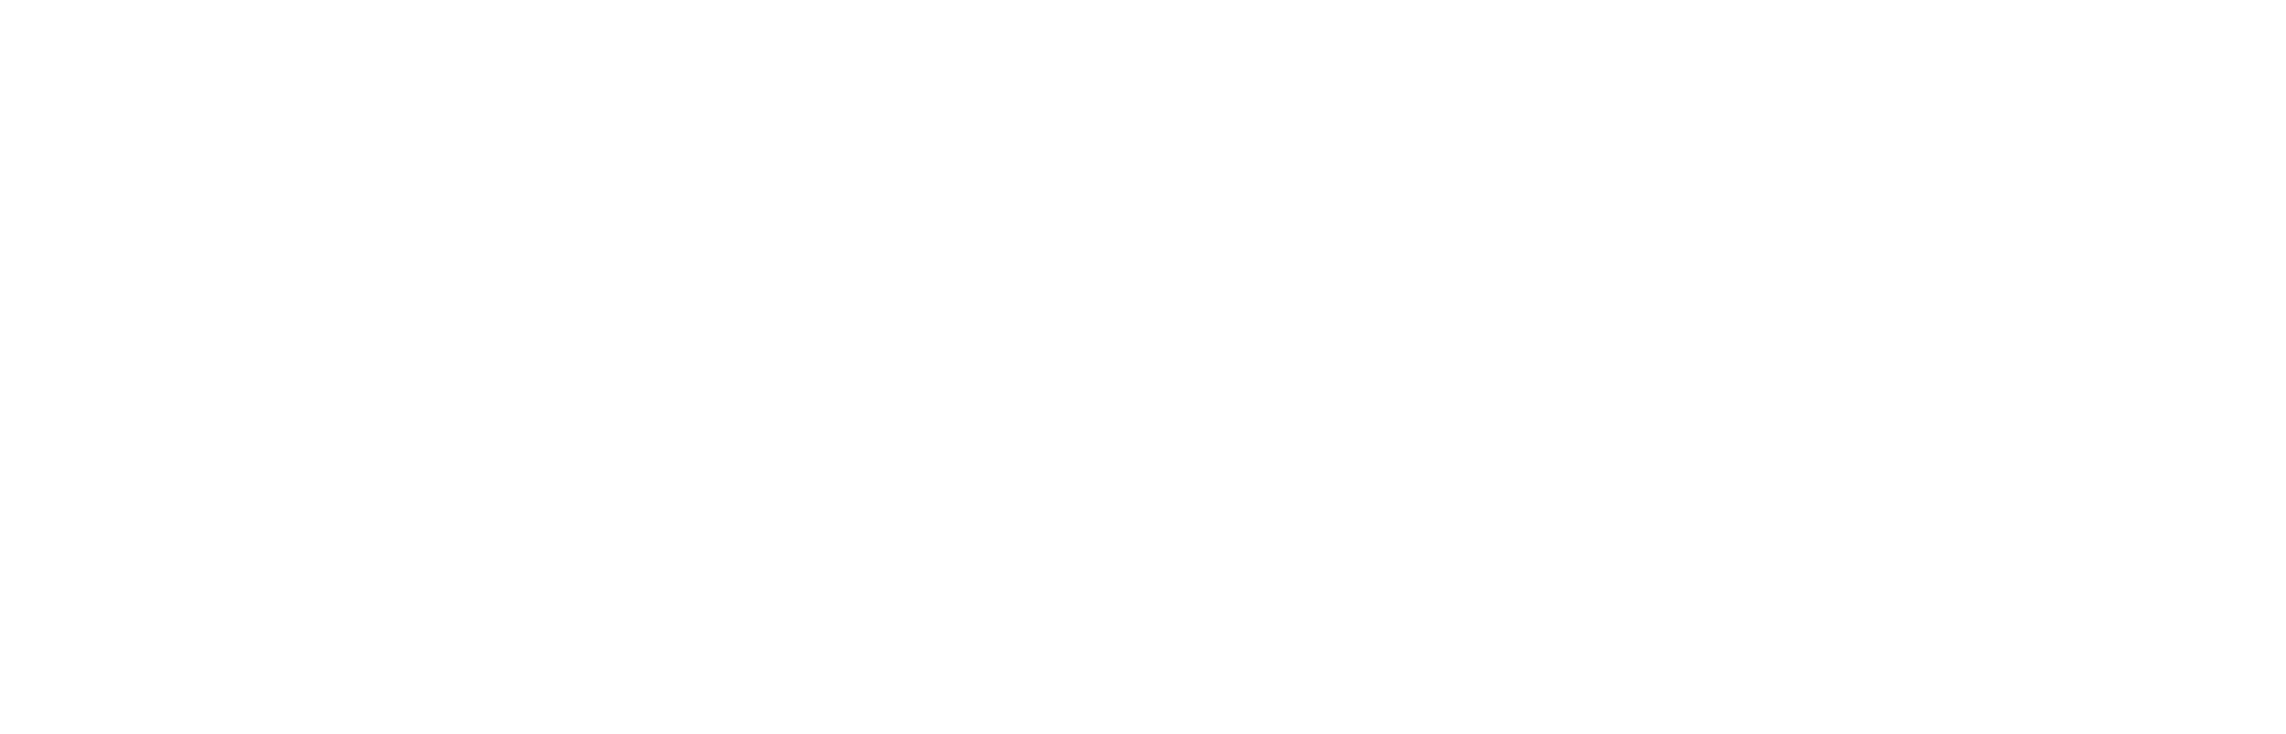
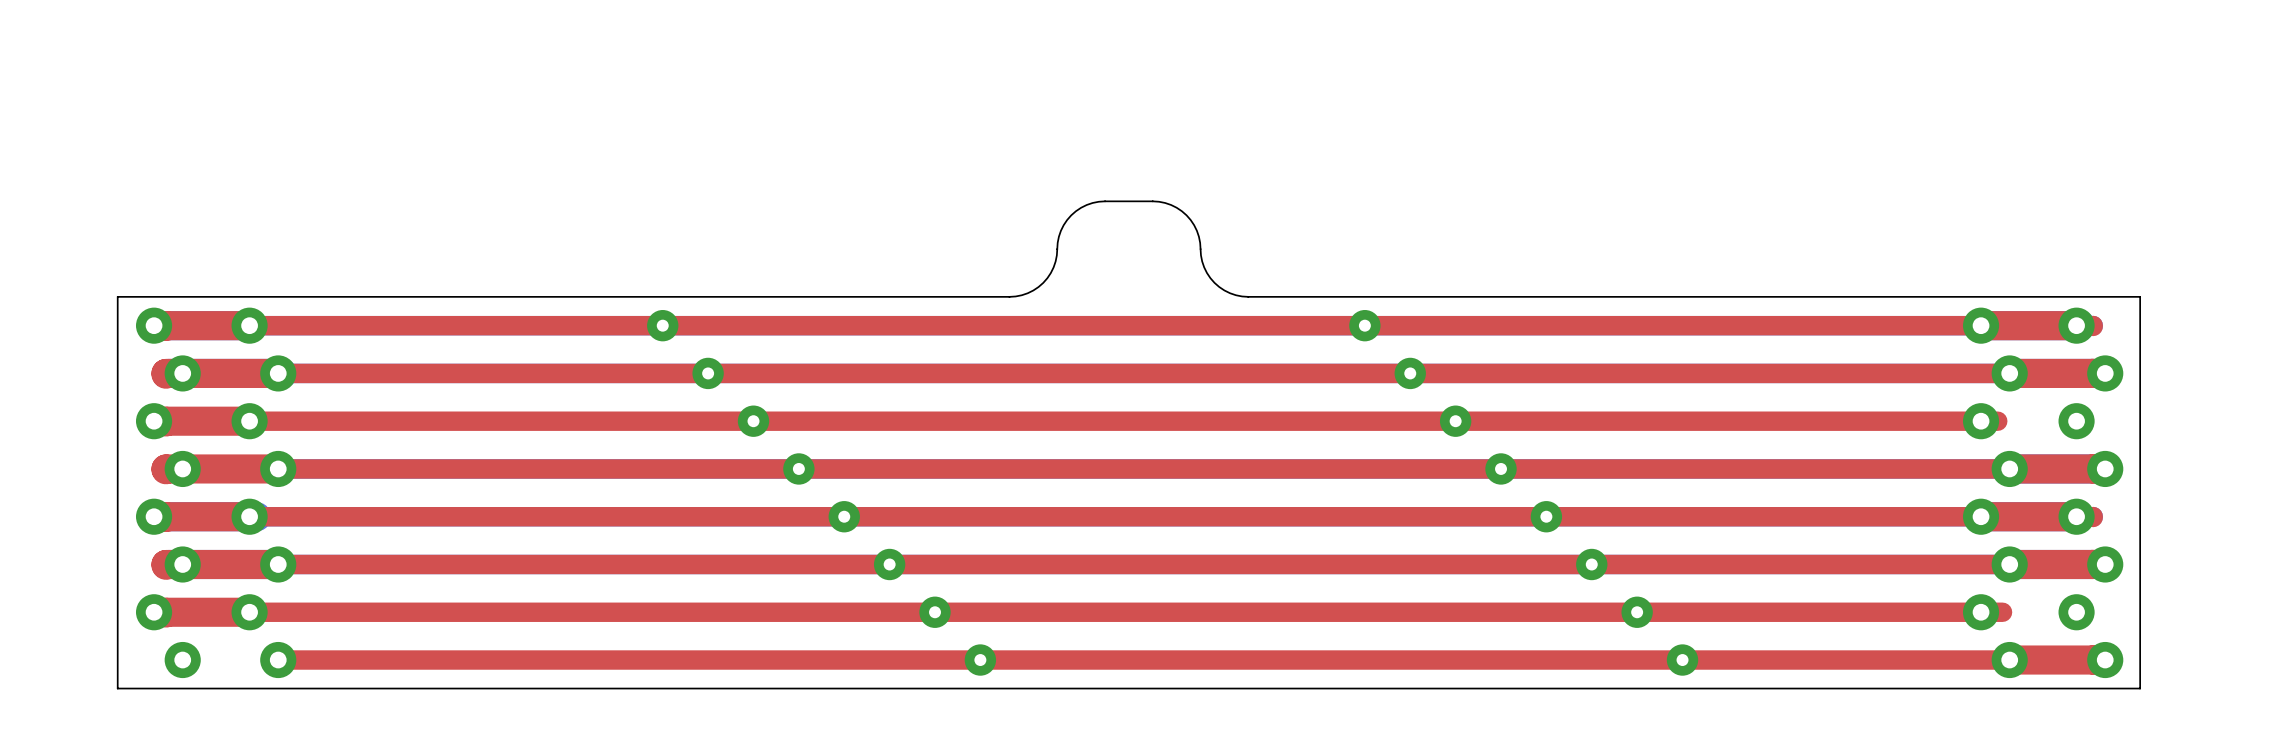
board edge: none -> (1105, 201) (1159, 201) (1171, 204) (1181, 211) (1190, 220) (1196, 230) (1202, 261) (1210, 278) (1224, 290) (1242, 296) (2140, 296) (2140, 688) (117, 688) (117, 296) (1015, 296) (1033, 290) (1047, 278) (1055, 261) (1060, 230) (1071, 215) (1086, 204) (1105, 201)
via: none -> (154, 325)
top track: none -> (166, 325) (2076, 325)
via: none -> (249, 325)
via: none -> (662, 325)
via: none -> (1364, 325)
via: none -> (1981, 325)
via: none -> (2076, 325)
top track: none -> (166, 373) (2093, 373)
via: none -> (182, 373)
via: none -> (278, 373)
via: none -> (708, 373)
via: none -> (1410, 373)
via: none -> (2009, 373)
via: none -> (2105, 373)
via: none -> (154, 421)
top track: none -> (166, 421) (1997, 421)
via: none -> (249, 421)
via: none -> (753, 421)
via: none -> (1455, 421)
via: none -> (1981, 421)
via: none -> (2076, 421)
top track: none -> (166, 468) (2093, 468)
via: none -> (182, 468)
via: none -> (278, 468)
via: none -> (798, 468)
via: none -> (1501, 468)
via: none -> (2009, 468)
via: none -> (2105, 468)
via: none -> (154, 516)
top track: none -> (166, 516) (2076, 516)
via: none -> (249, 516)
via: none -> (844, 516)
via: none -> (1546, 516)
via: none -> (1981, 516)
via: none -> (2076, 516)
top track: none -> (166, 564) (2093, 564)
via: none -> (182, 564)
via: none -> (278, 564)
via: none -> (889, 564)
via: none -> (1591, 564)
via: none -> (2009, 564)
via: none -> (2105, 564)
via: none -> (154, 612)
top track: none -> (166, 612) (2002, 612)
via: none -> (249, 612)
via: none -> (935, 612)
via: none -> (1637, 612)
via: none -> (1981, 612)
via: none -> (2076, 612)
via: none -> (182, 660)
top track: none -> (278, 660) (2093, 660)
via: none -> (278, 660)
via: none -> (980, 660)
via: none -> (1682, 660)
via: none -> (2009, 660)
via: none -> (2105, 660)

